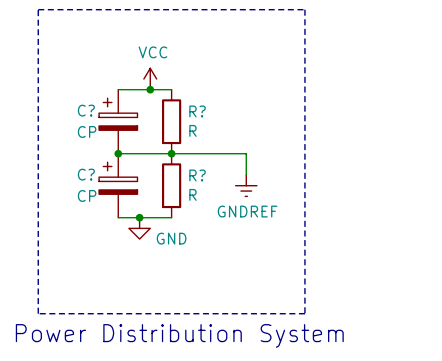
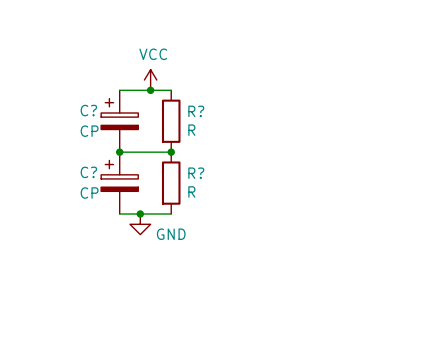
line: (38, 9) (38, 313) (304, 313) (304, 9) (38, 9) -> none
wire: (171, 153) (246, 153) (246, 175) -> none
power symbol: GNDREF (246, 185) -> none
text: Power Distribution System (179, 335) -> none

